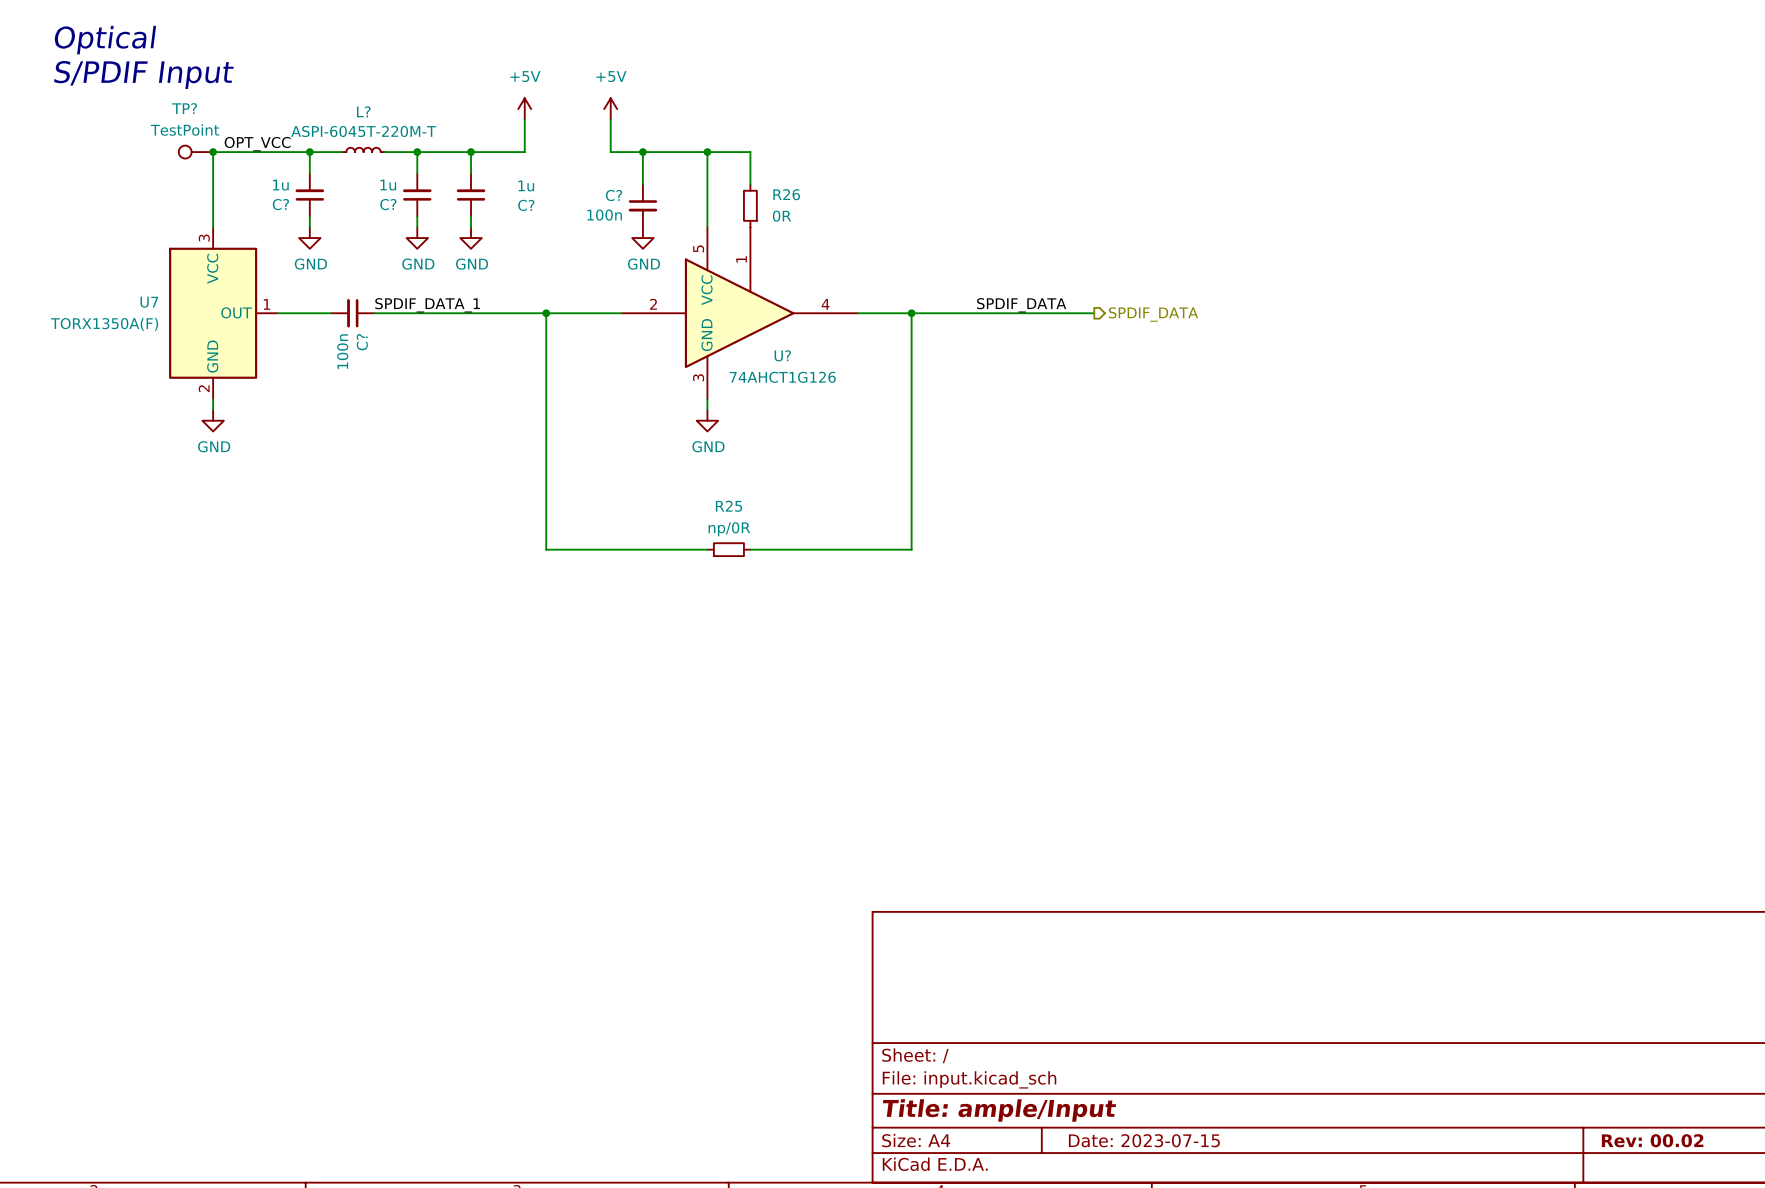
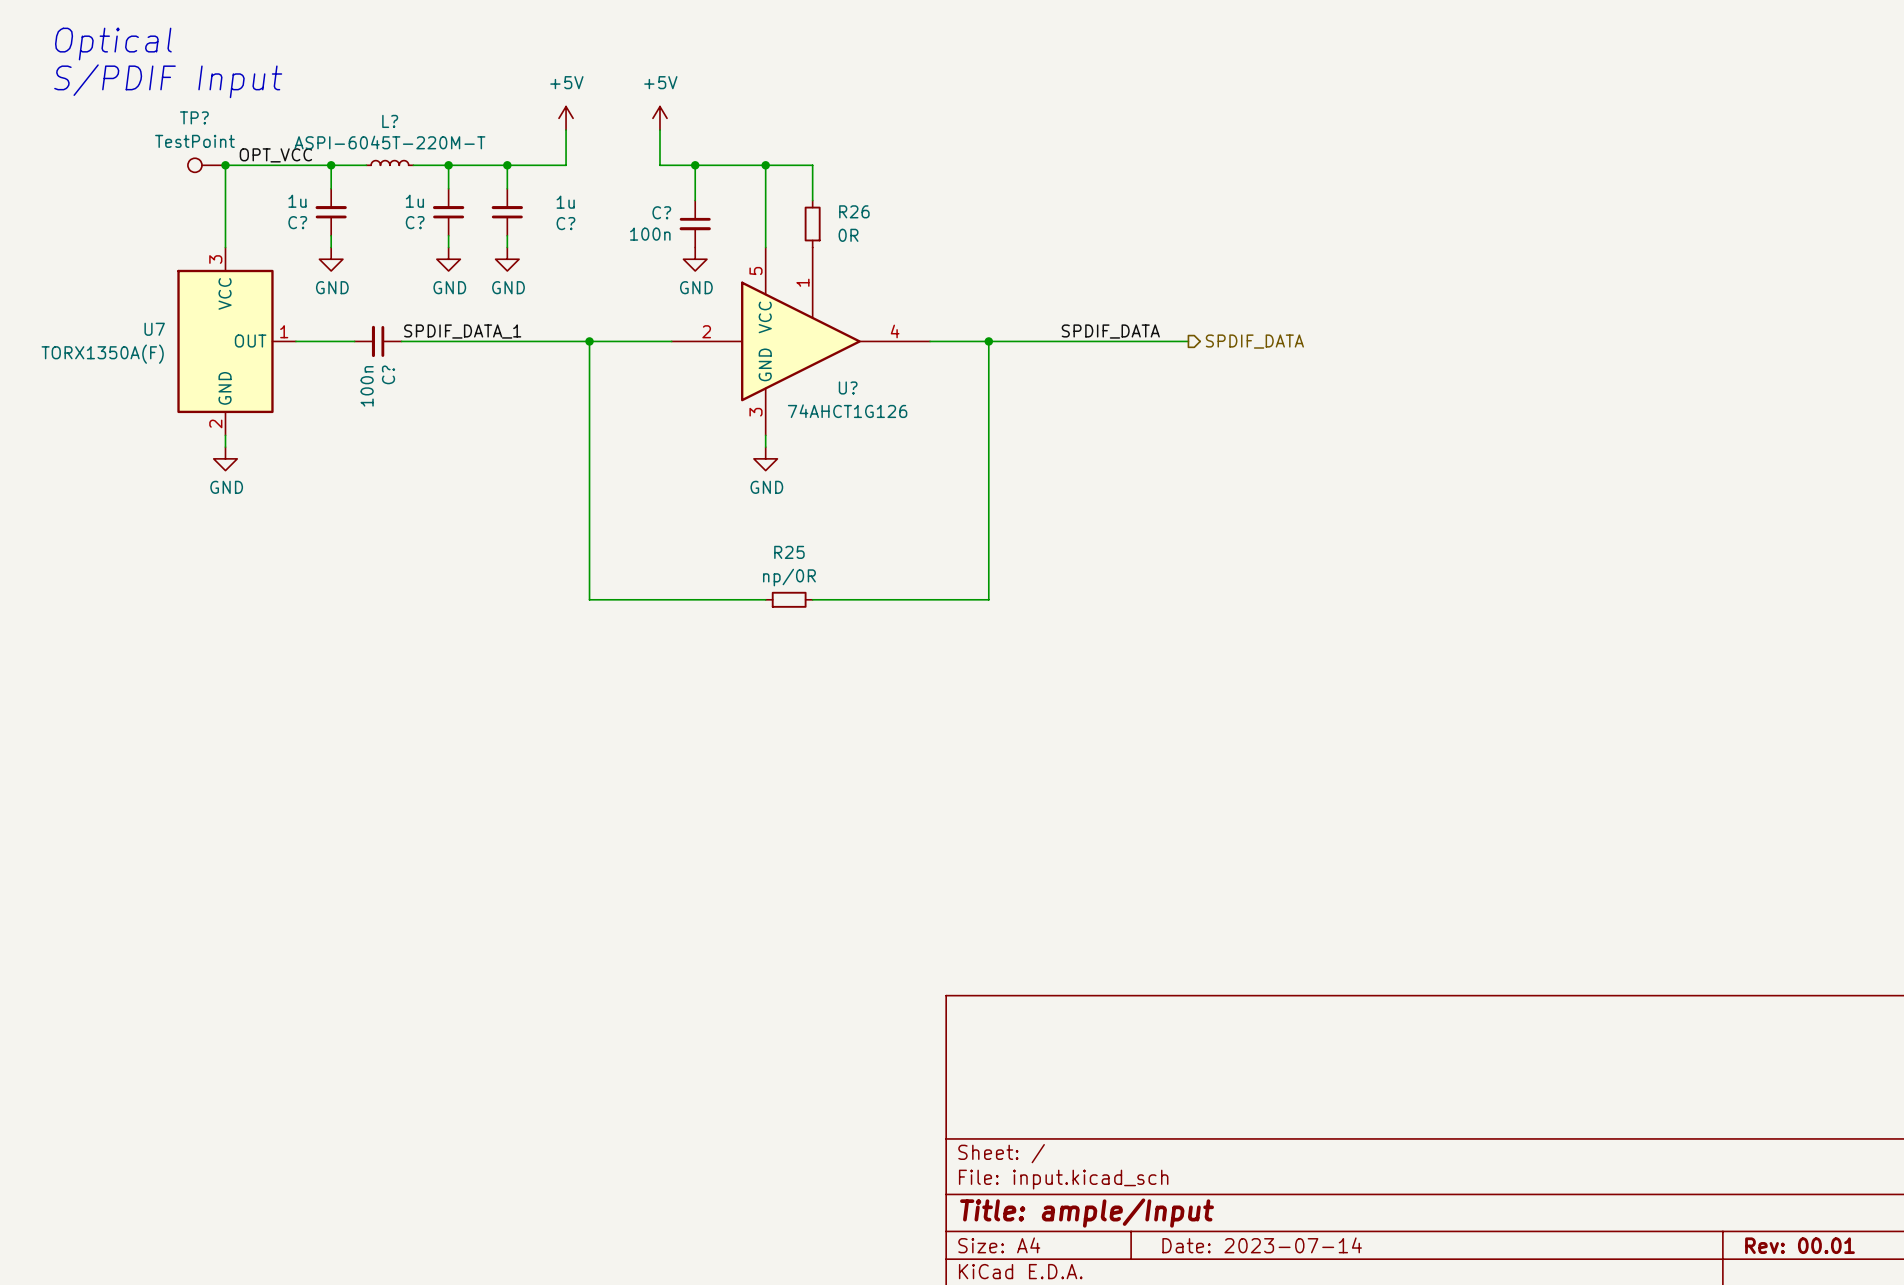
title block: Date: 2023-07-15 (1144, 1140) -> Date: 2023-07-14 (1262, 1245)
title block: Rev: 00.02 (1652, 1140) -> Rev: 00.01 (1800, 1245)

